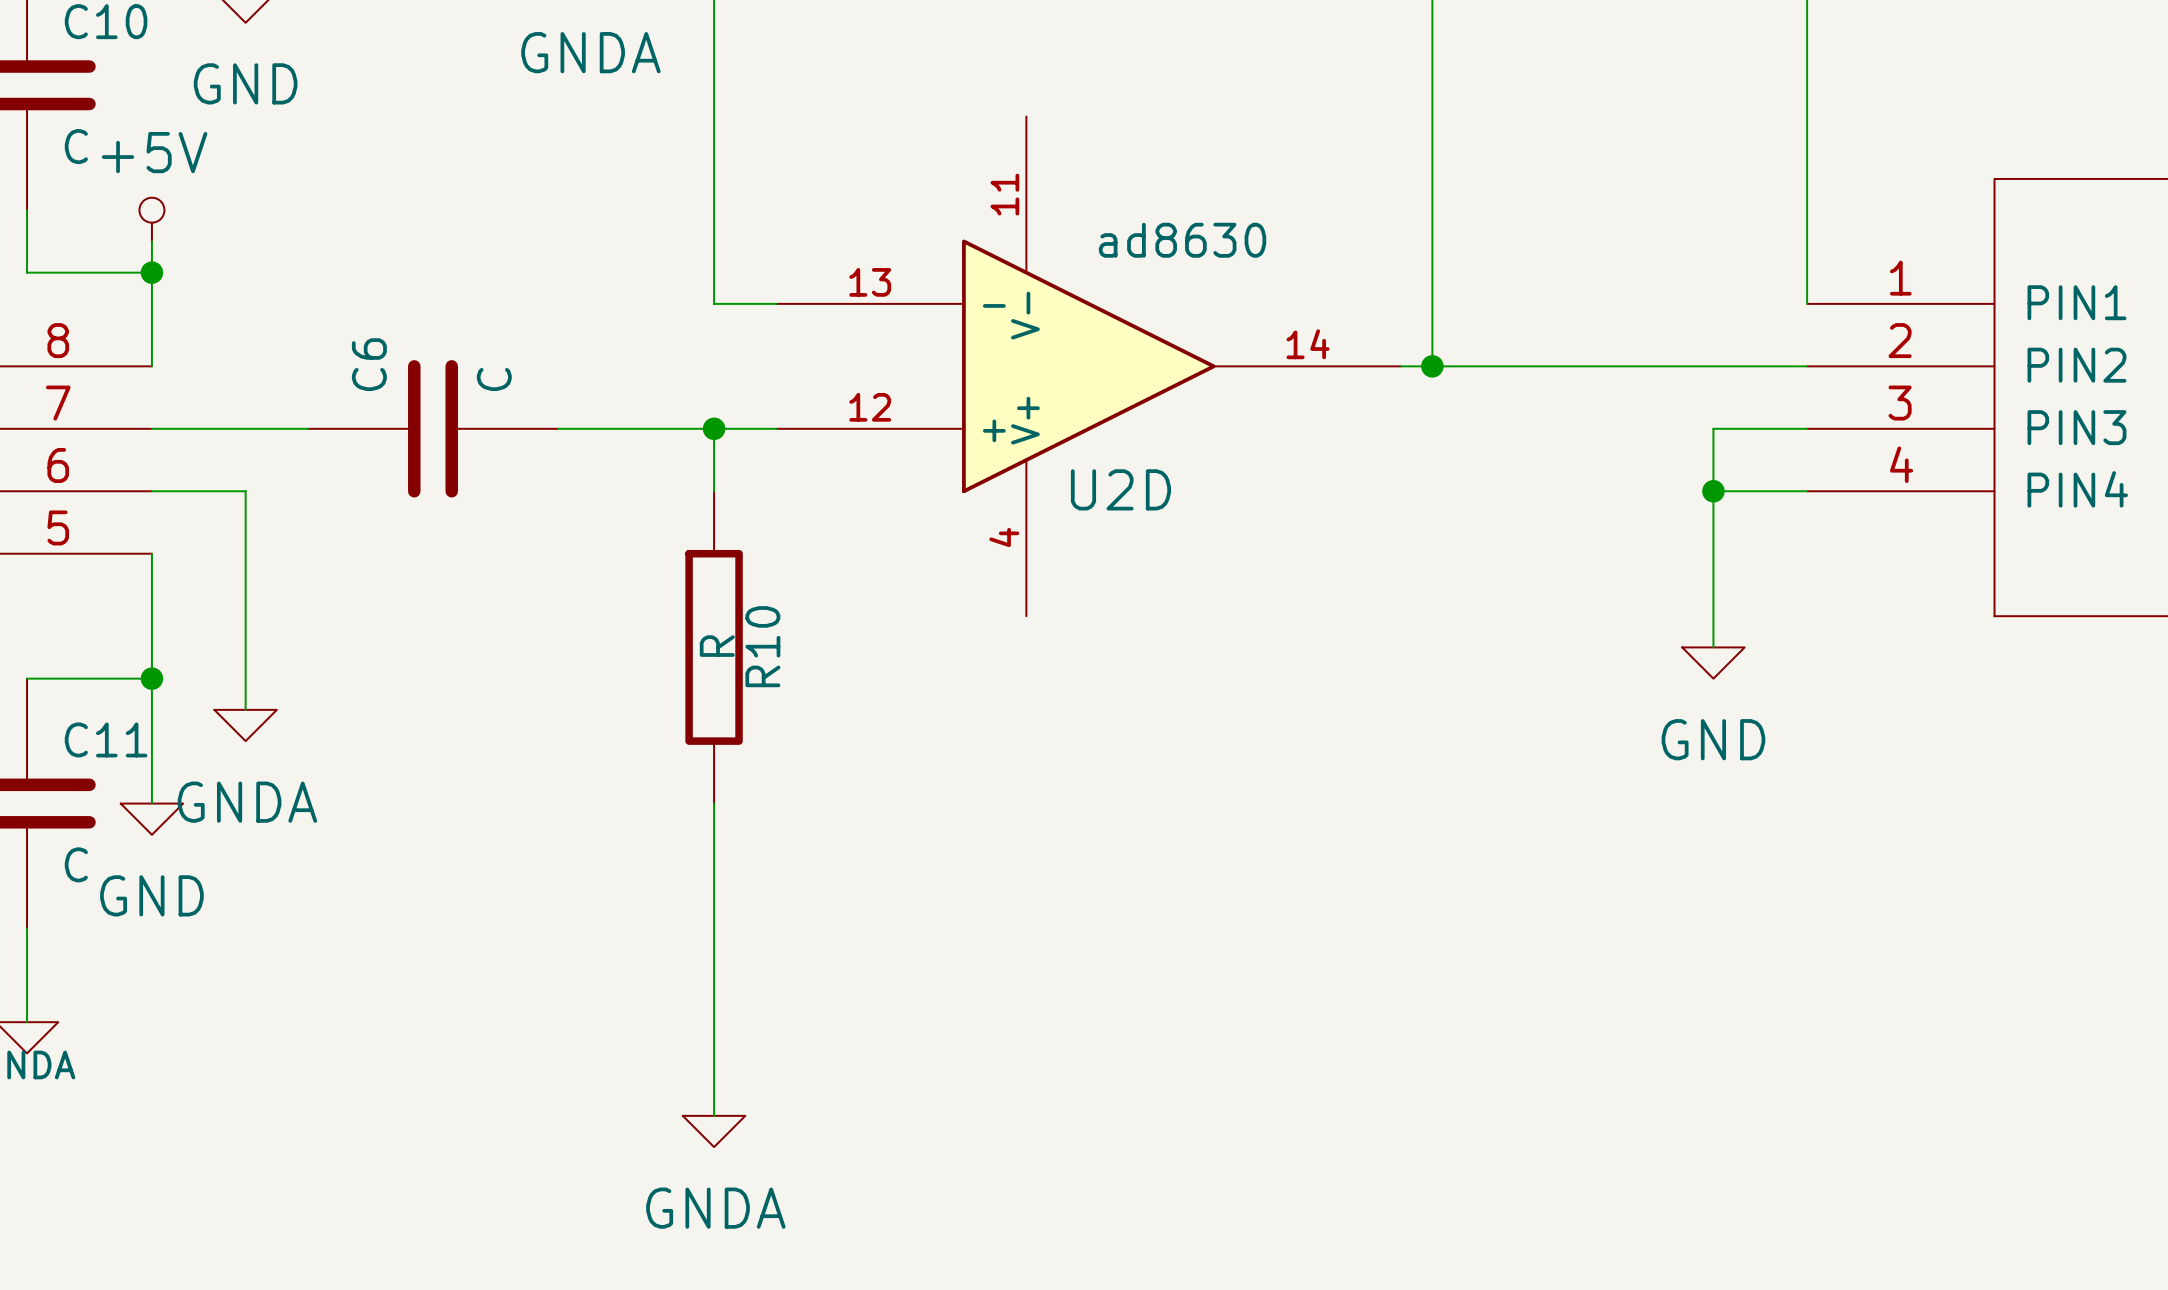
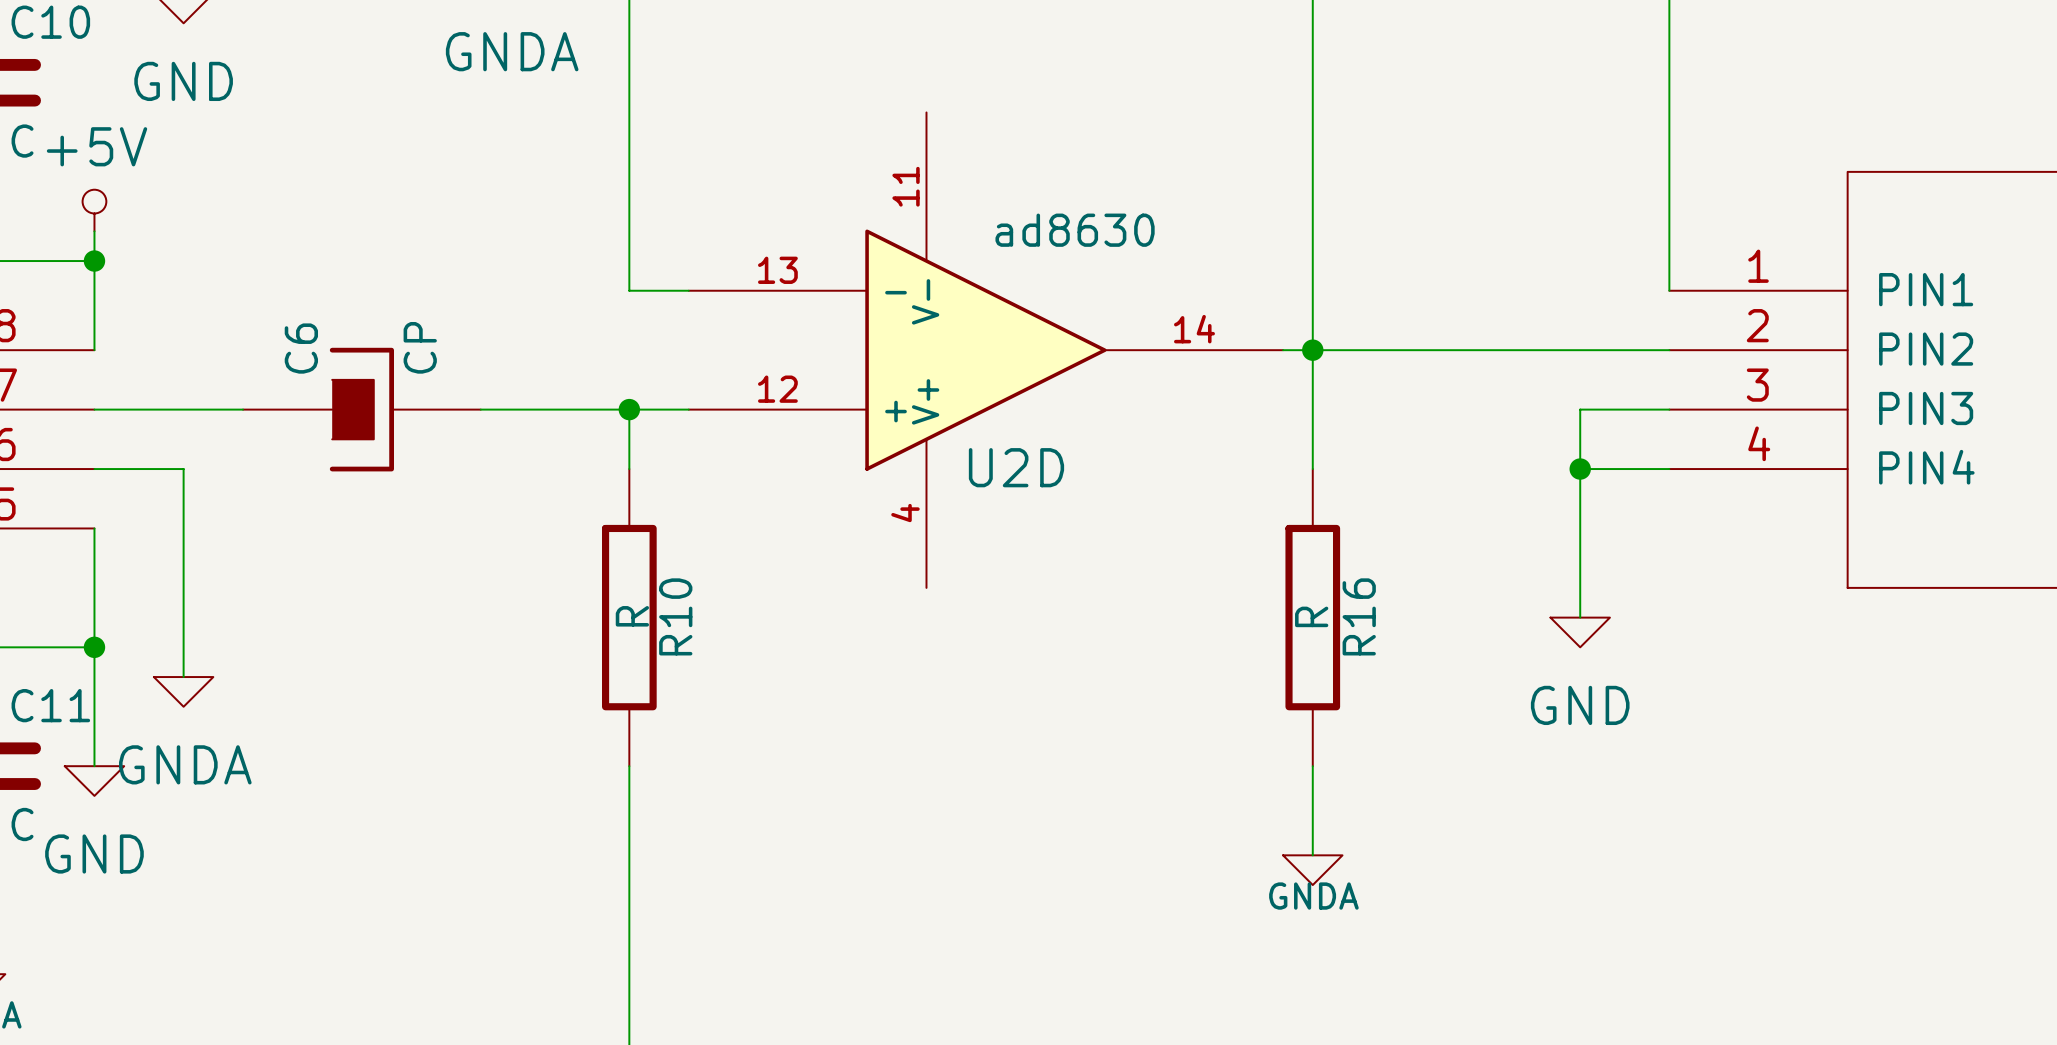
C6 symbol: [308, 360, 558, 498] -> [243, 347, 481, 472]
wire: none -> (1312, 350) (1312, 469)
C6 value: C (494, 379) -> CP (420, 347)
R16: none -> R (1312, 617)
wire: none -> (1312, 766) (1312, 855)
power symbol: none -> GNDA (1312, 870)

